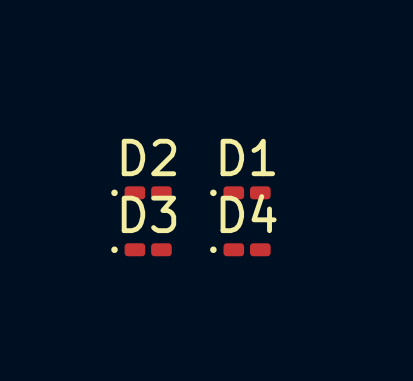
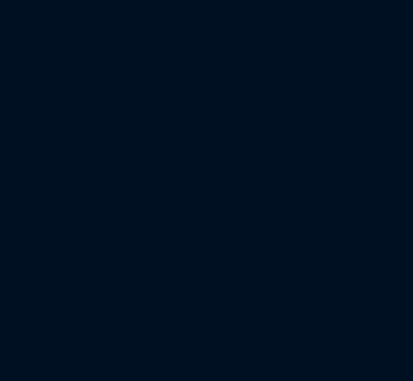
D2: (141, 192) -> none
D1: (240, 192) -> none
D3: (141, 249) -> none
D4: (240, 249) -> none

